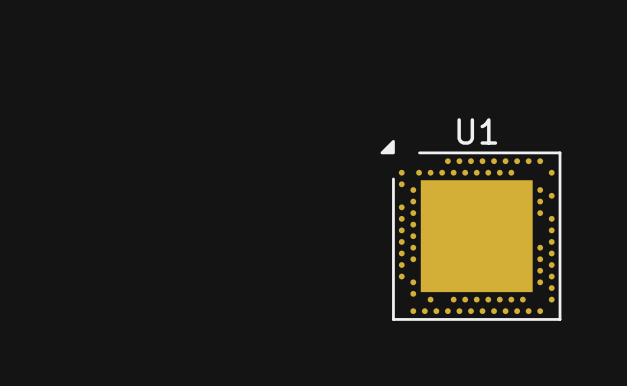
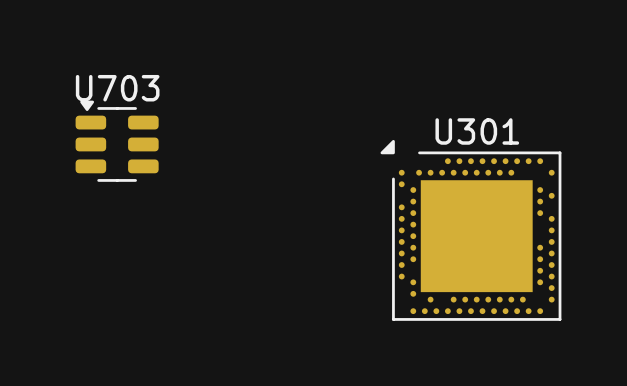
U1 name: U1 (477, 131) -> U301 (477, 131)
U703: none -> (117, 141)

